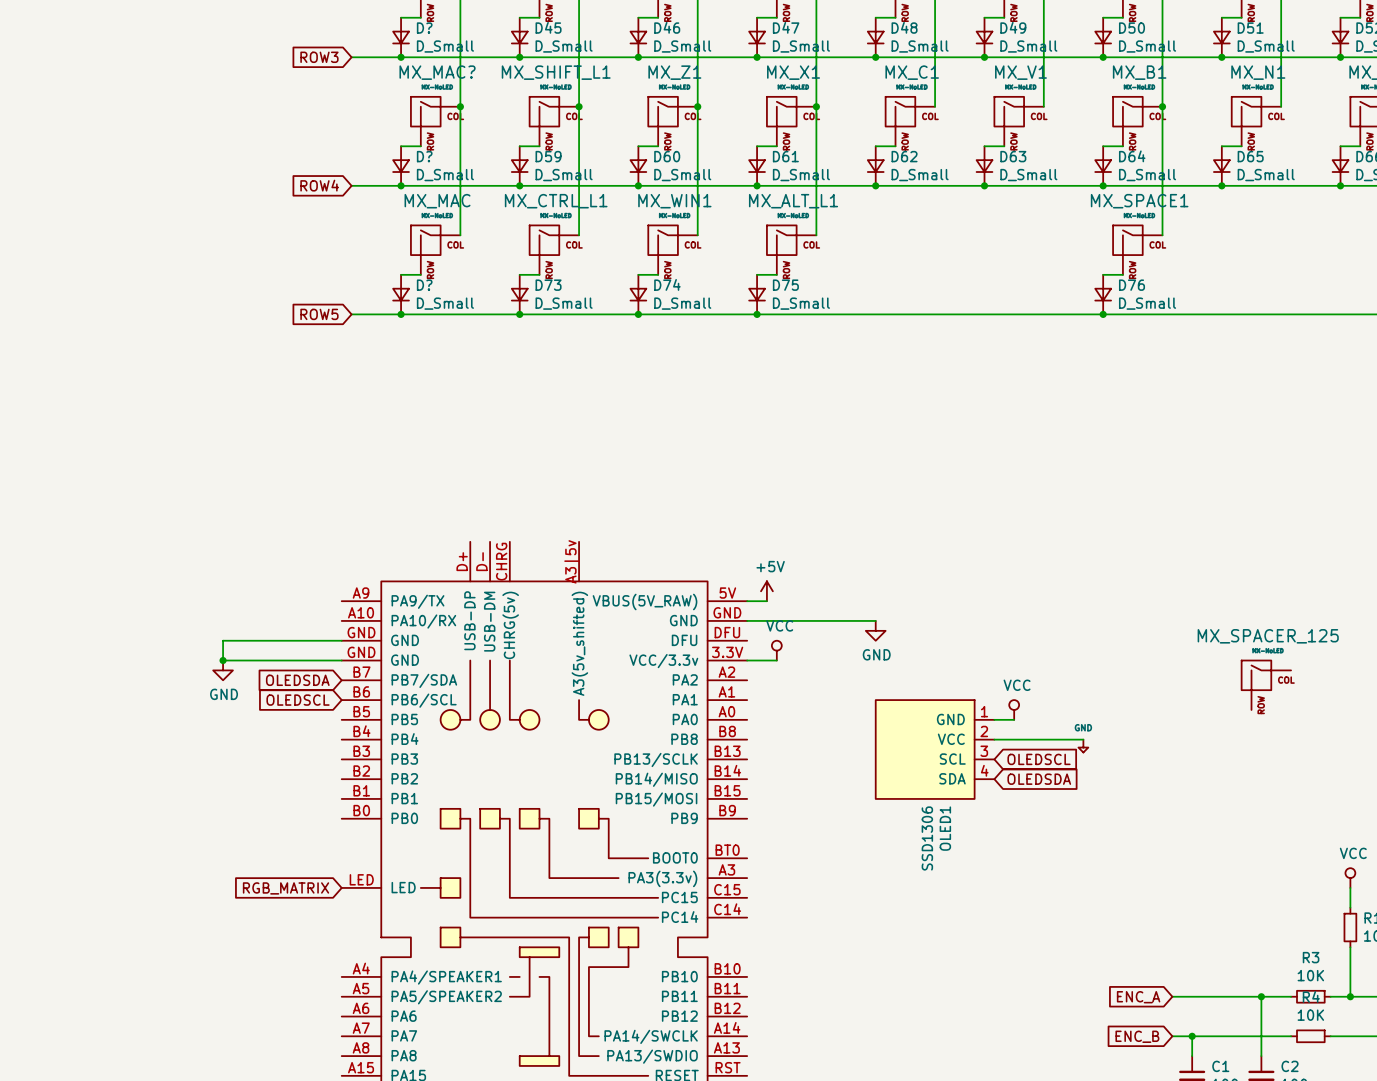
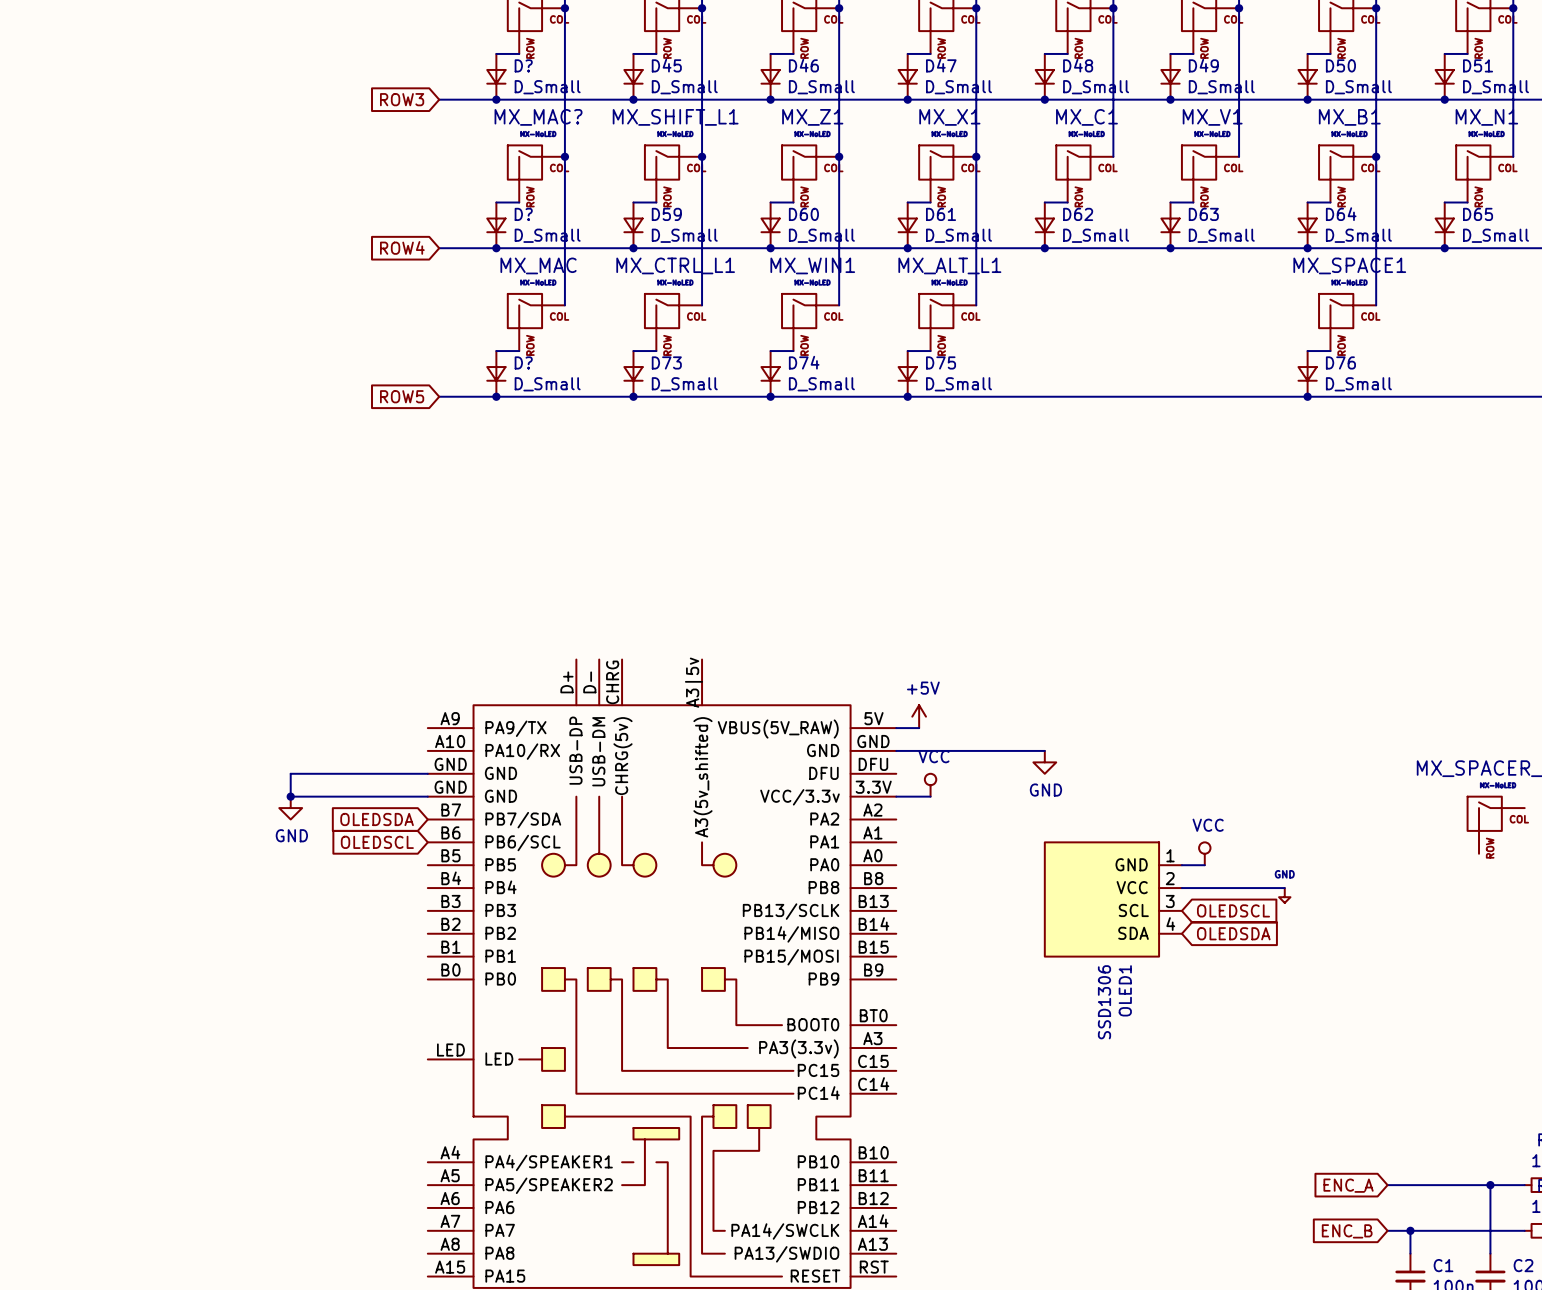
global label: RGB_MATRIX (286, 888) -> none

